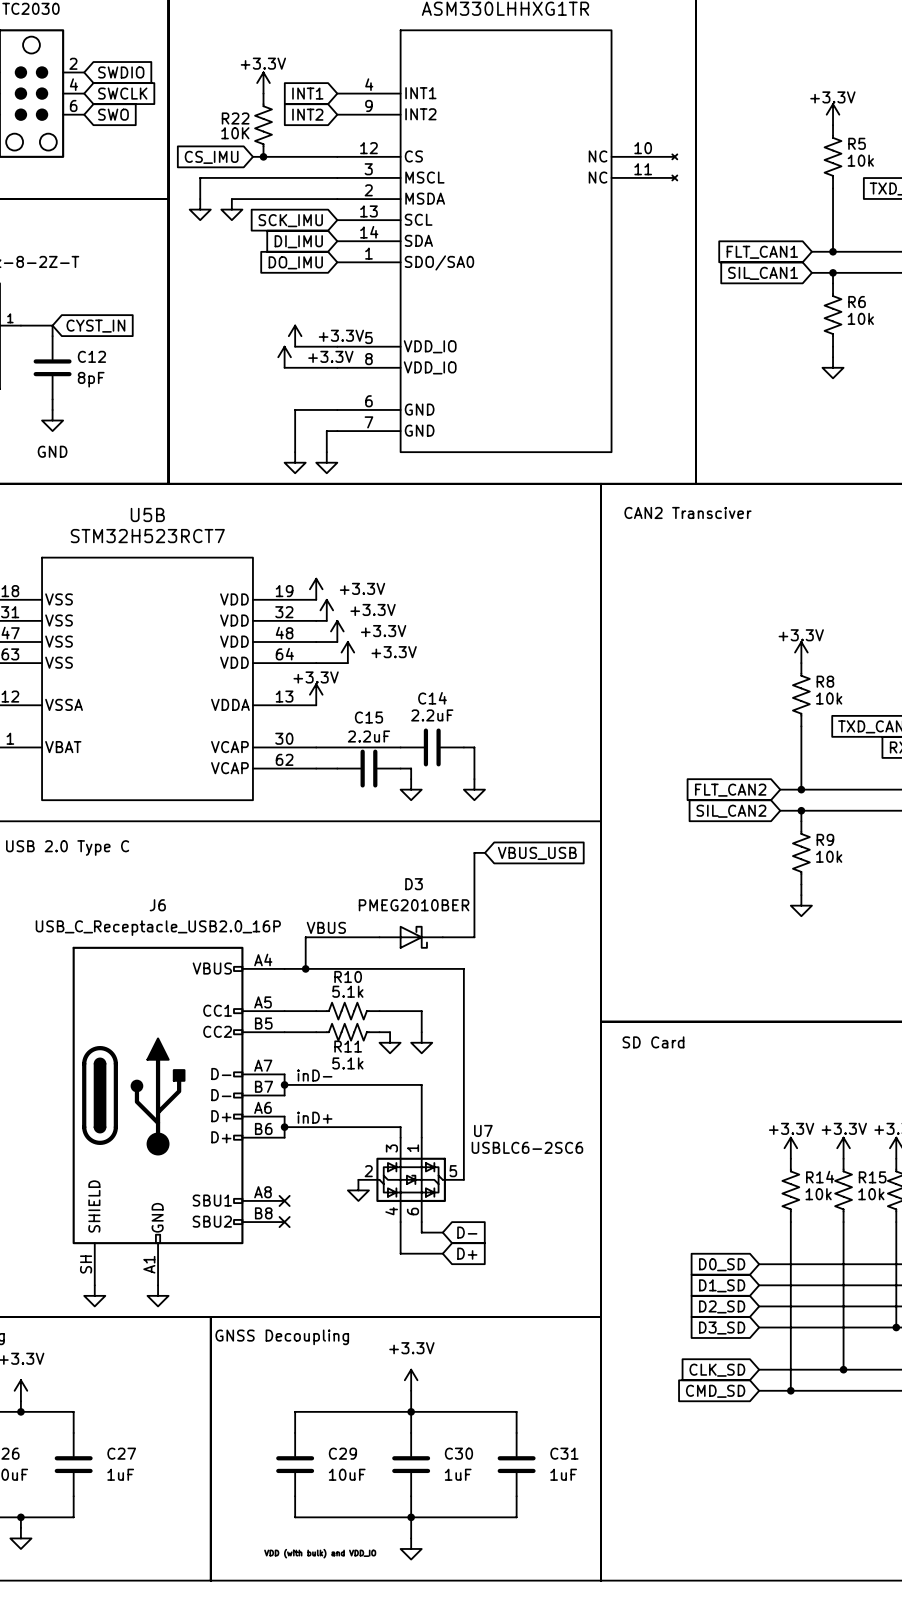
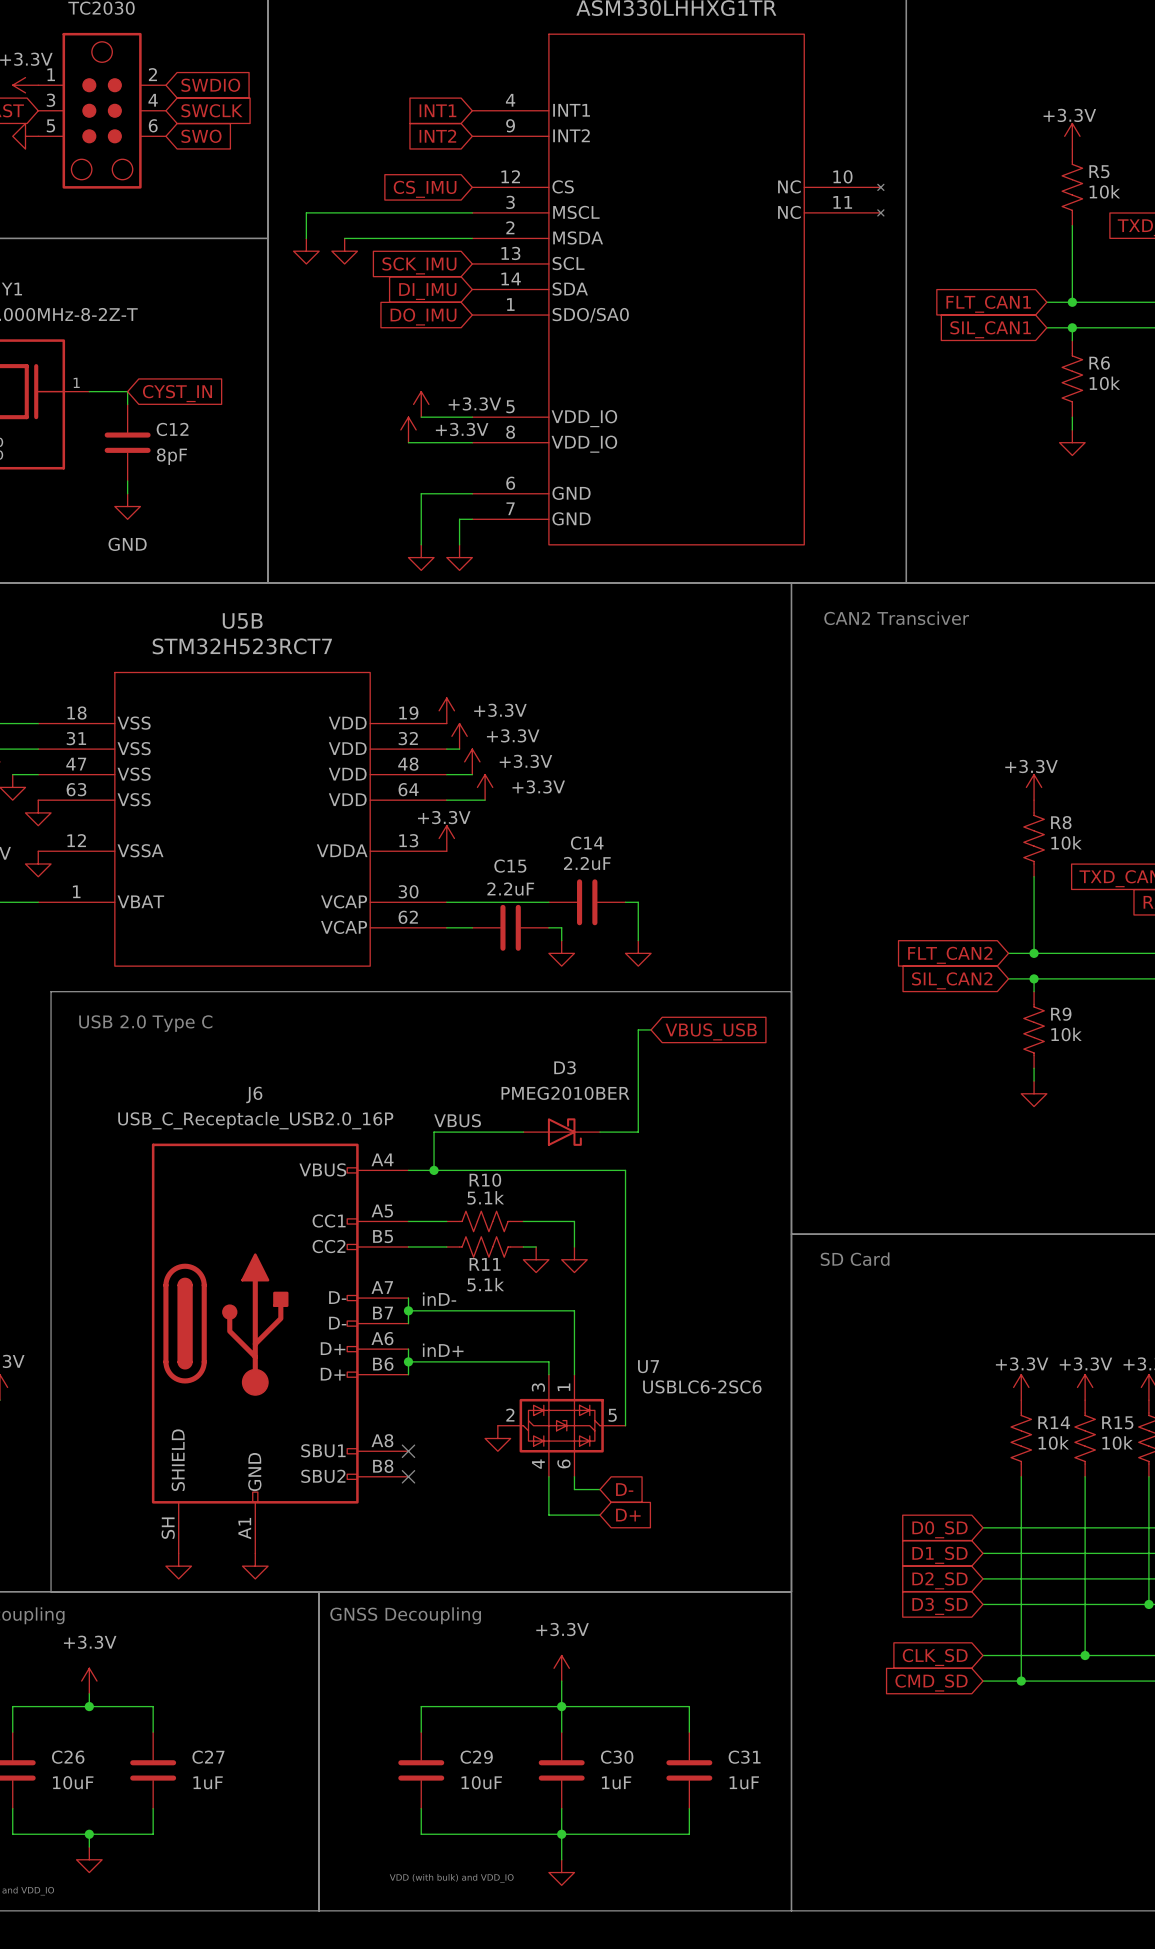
power symbol: +3.3V (263, 83) -> none
R22: 10K (263, 125) -> none
wire: (252, 156) (337, 156) -> none
junction: (263, 156) -> none
global label position: CS_IMU (211, 157) -> CS_IMU (425, 189)

